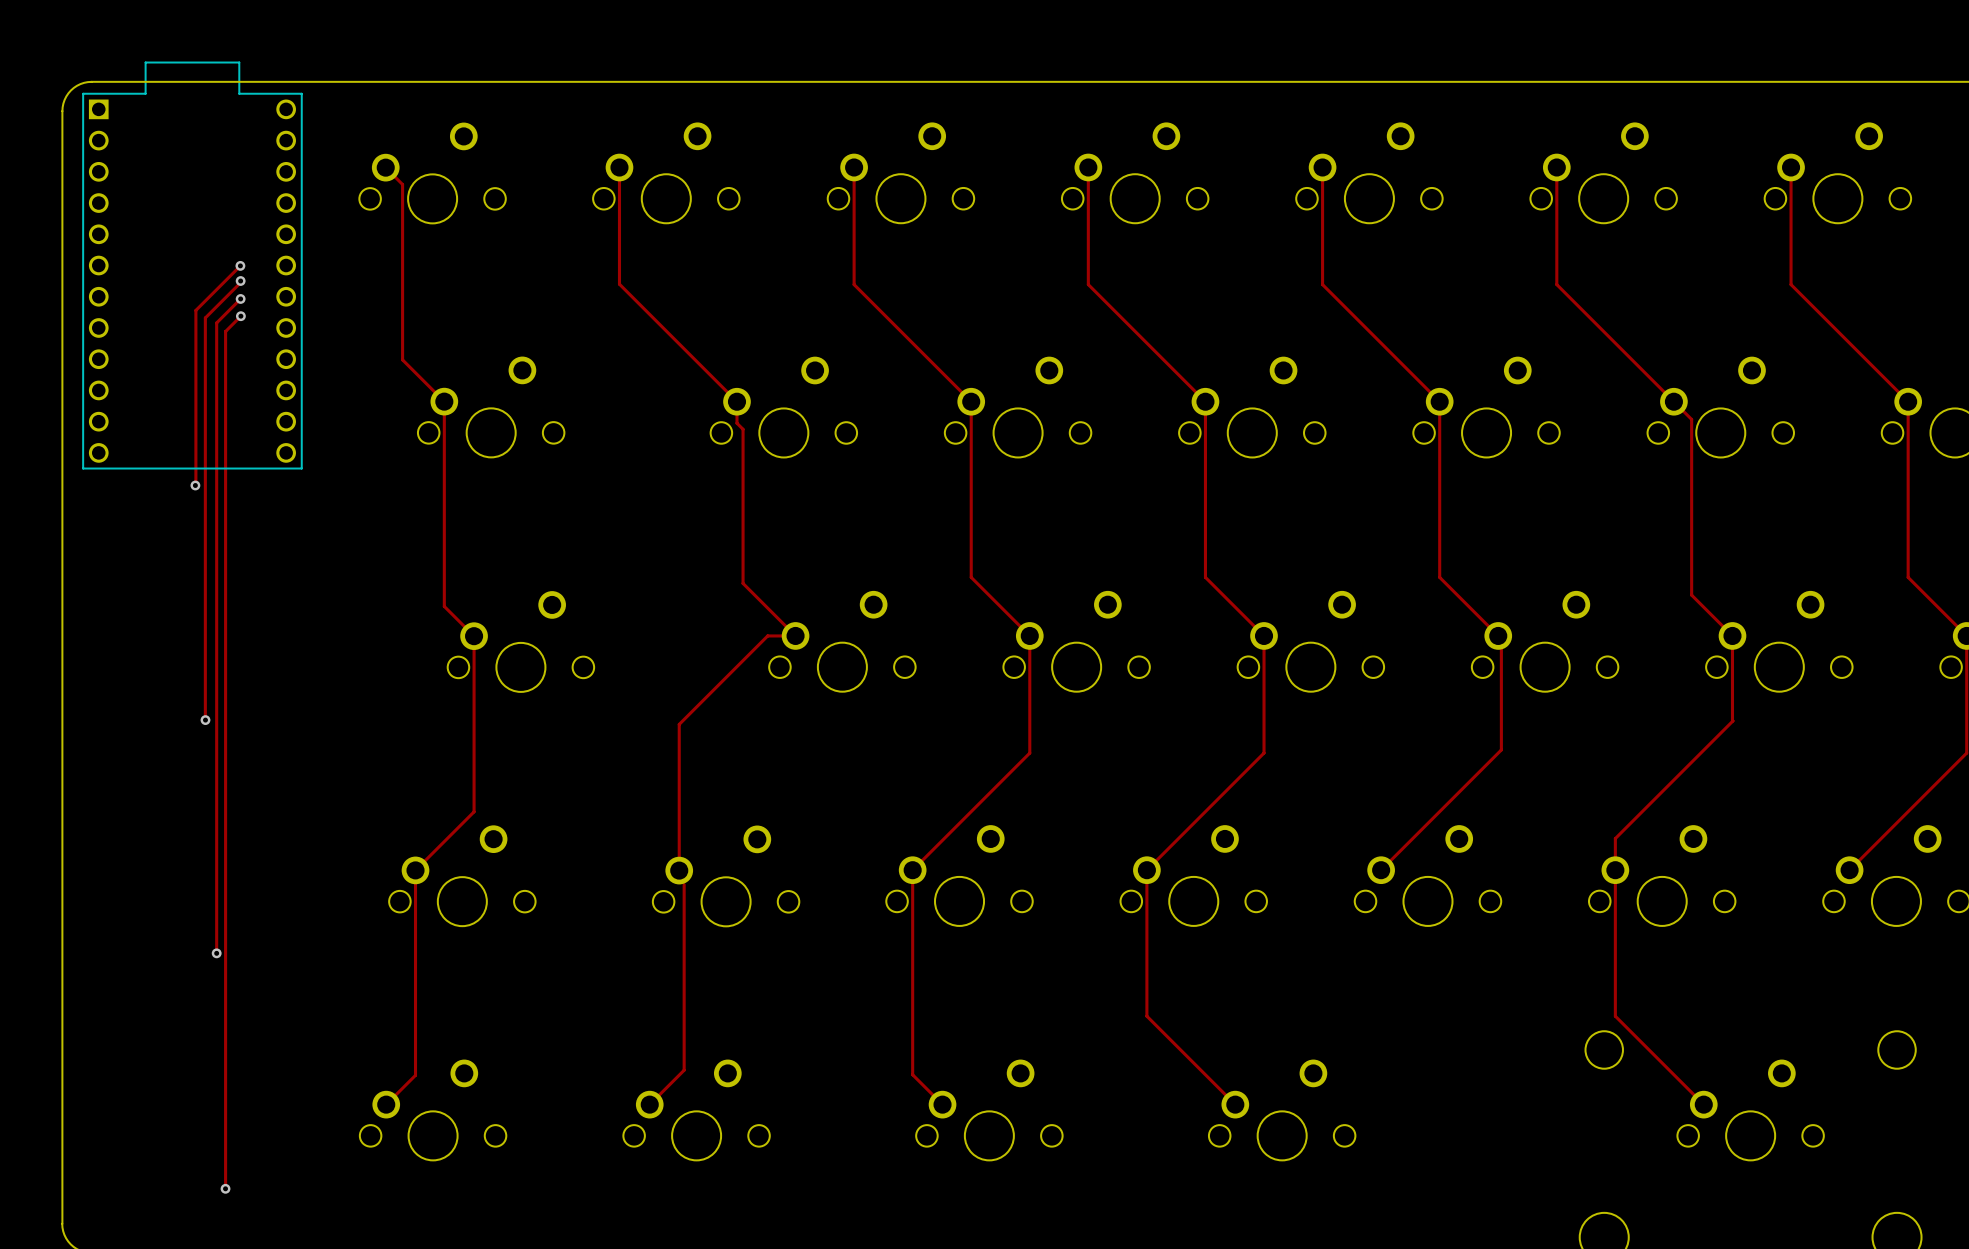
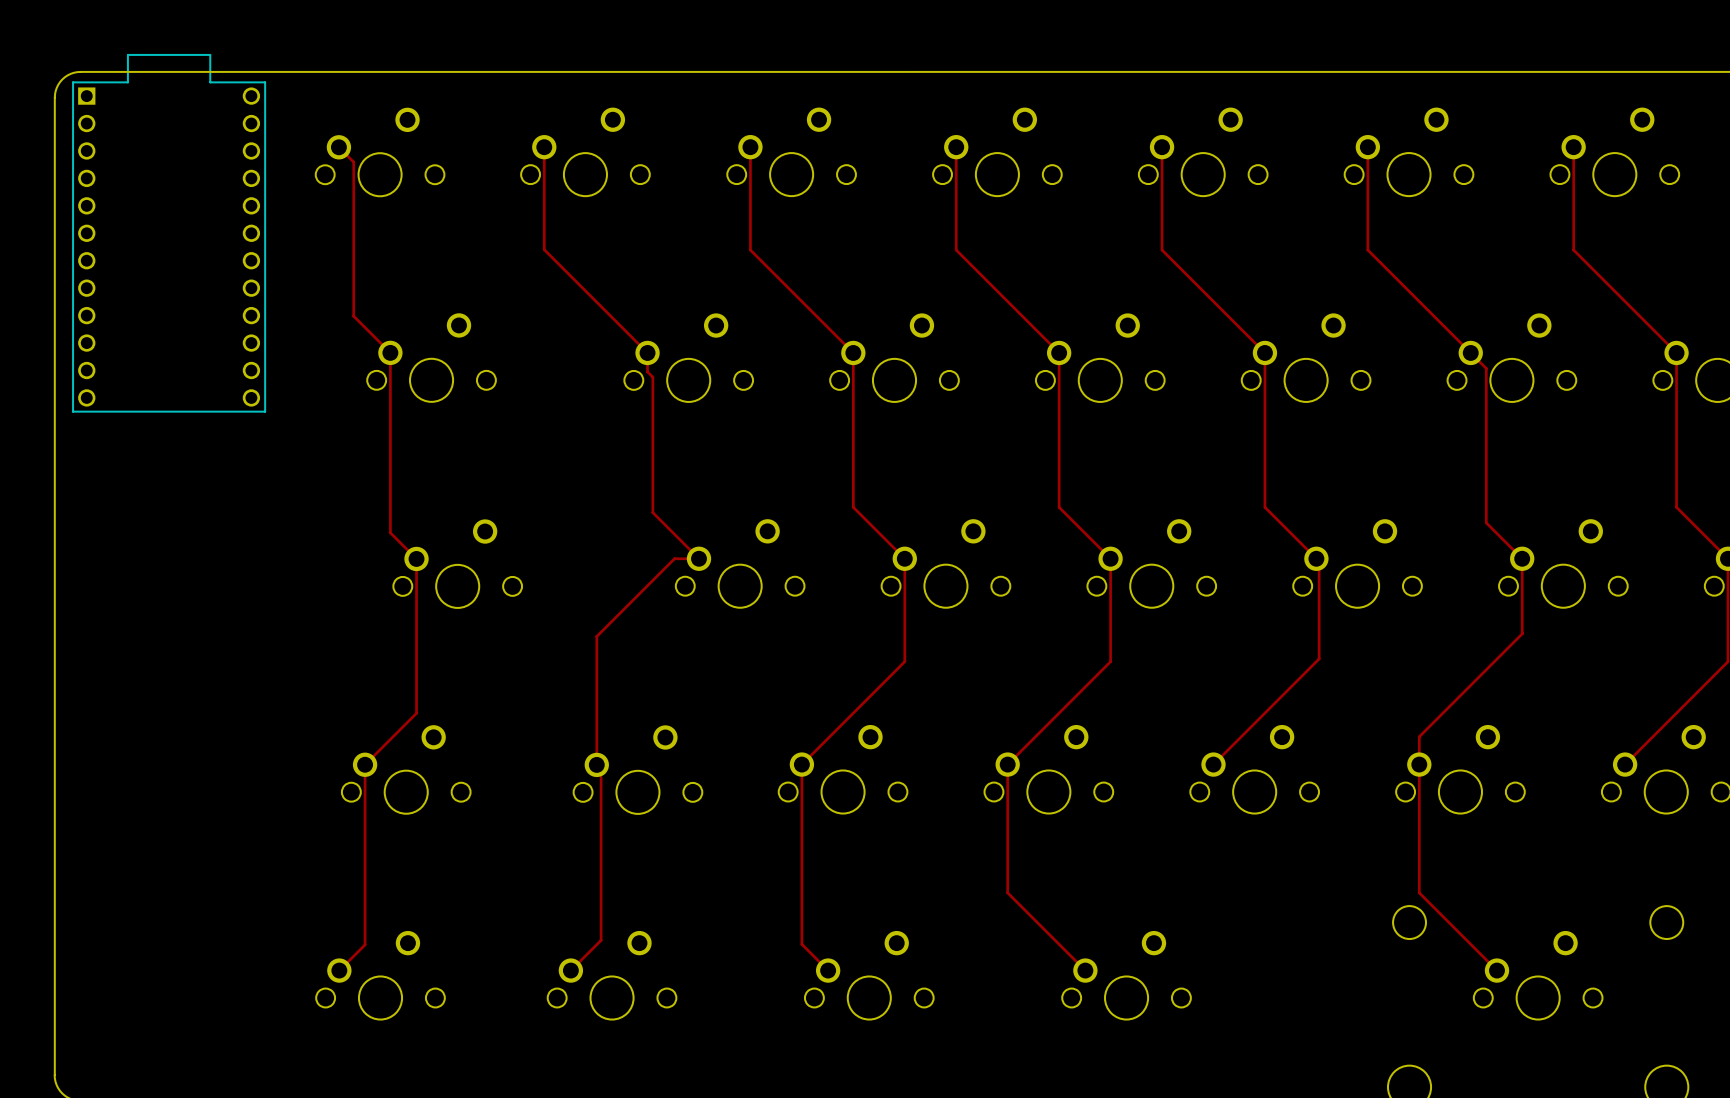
track: (240, 265) (195, 310) (195, 485) -> none
via: (240, 265) -> none
track: (240, 281) (205, 317) (205, 719) -> none
via: (240, 281) -> none
track: (240, 298) (216, 322) (216, 953) -> none
via: (240, 298) -> none
track: (240, 316) (225, 331) -> none
via: (240, 316) -> none
track: (225, 331) (225, 1188) -> none
via: (195, 485) -> none
via: (205, 720) -> none
via: (216, 953) -> none
via: (225, 1188) -> none

